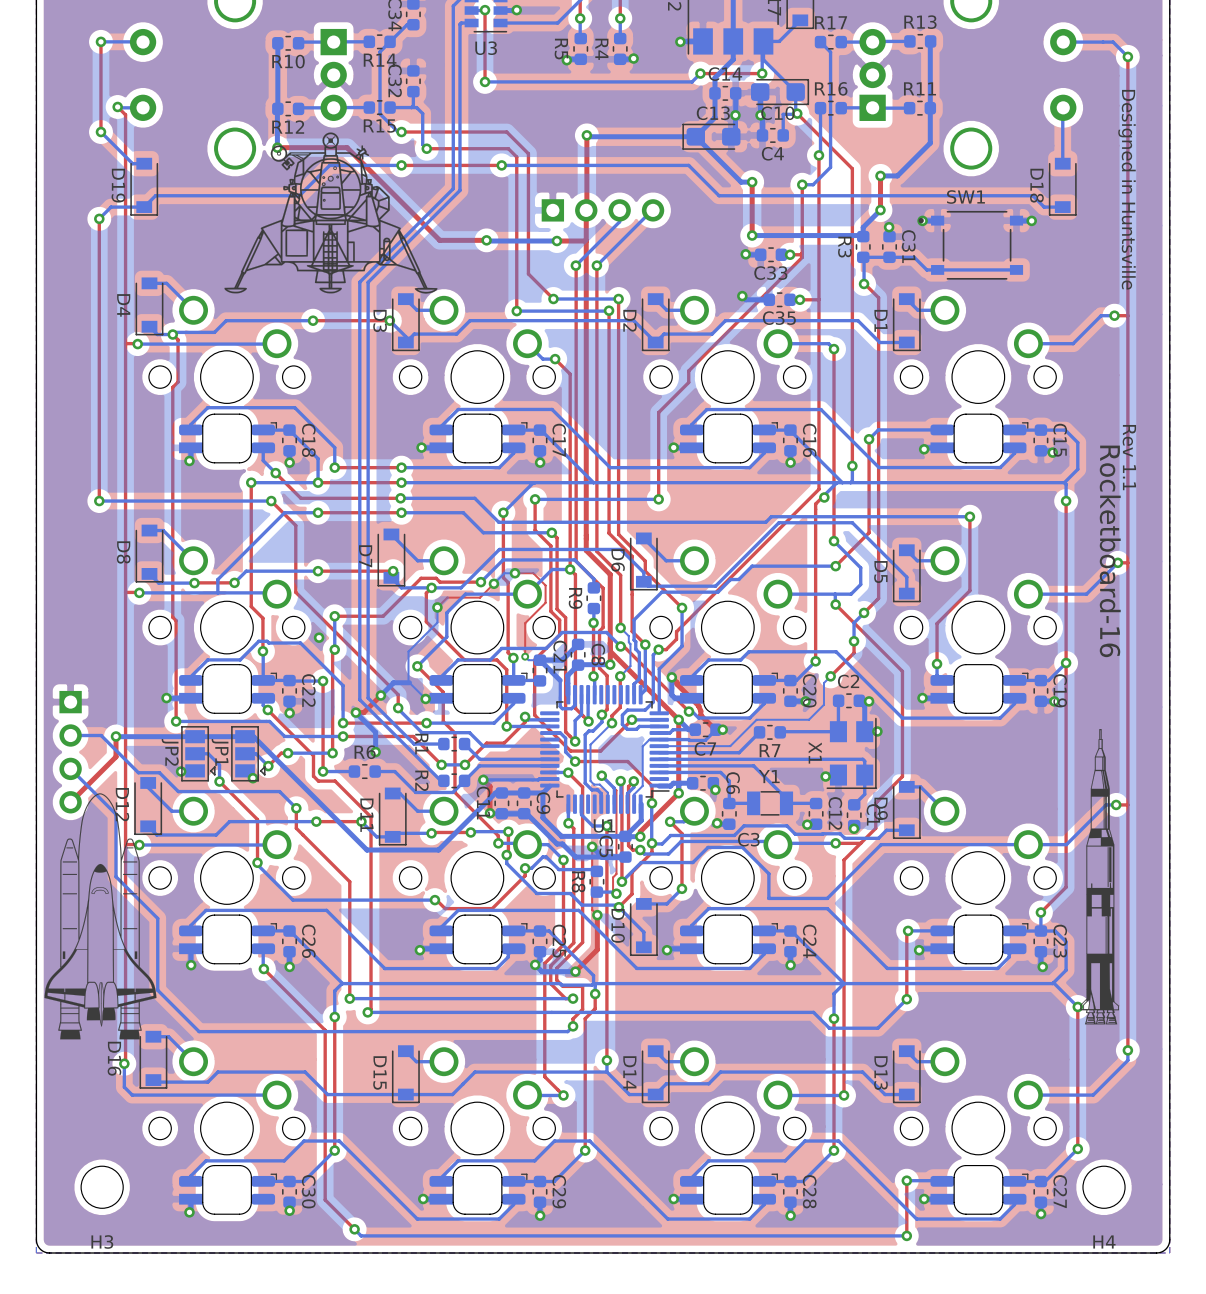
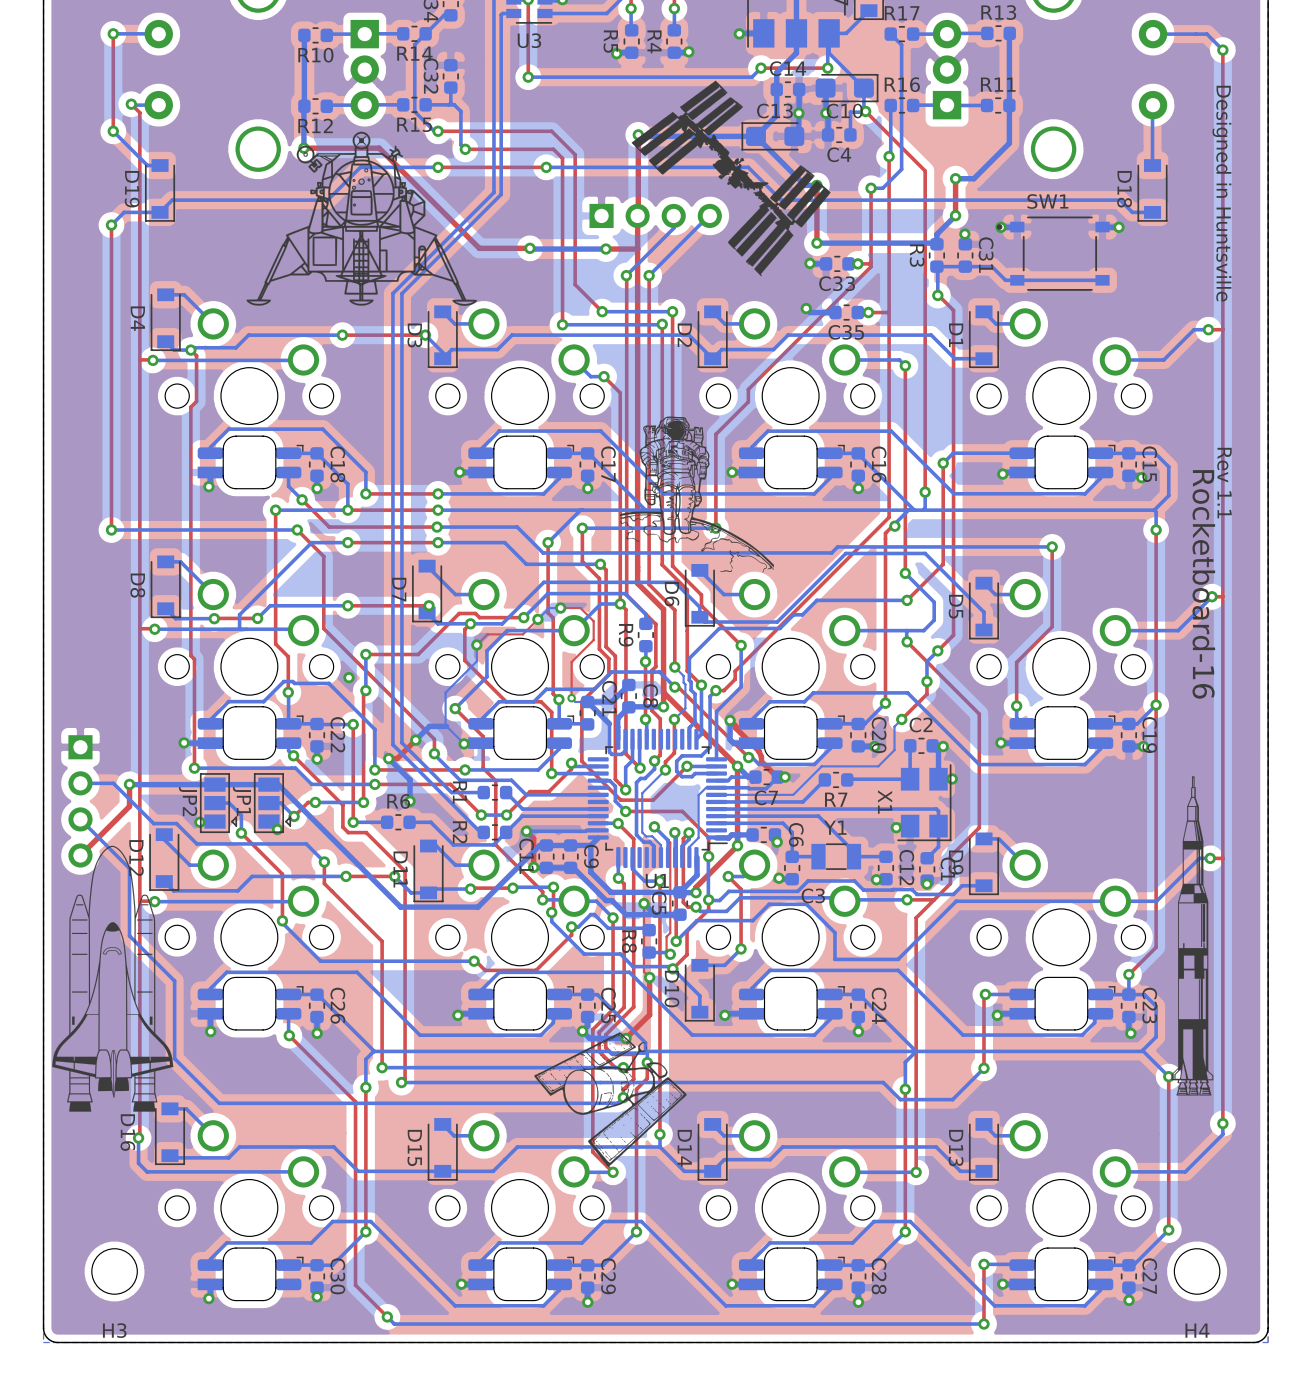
drawing: none -> [631, 80, 831, 277]
drawing: none -> [619, 416, 774, 573]
drawing: none -> [534, 1032, 687, 1167]

